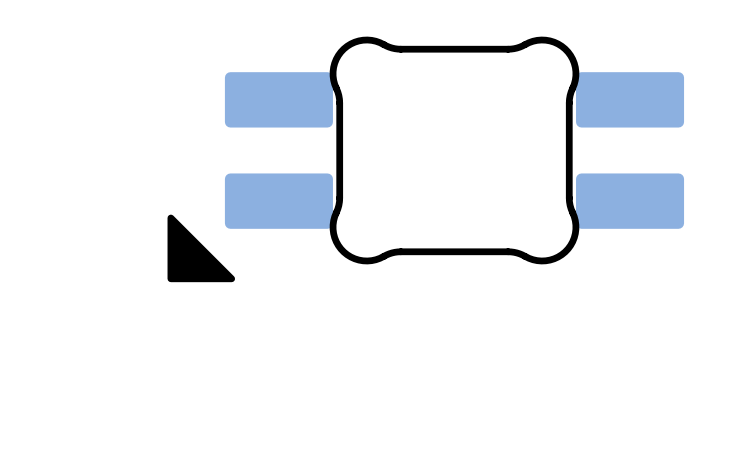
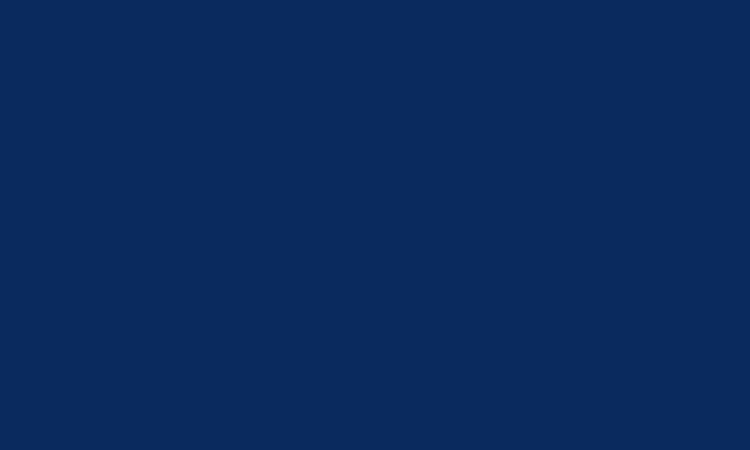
part: (425, 159) -> none

